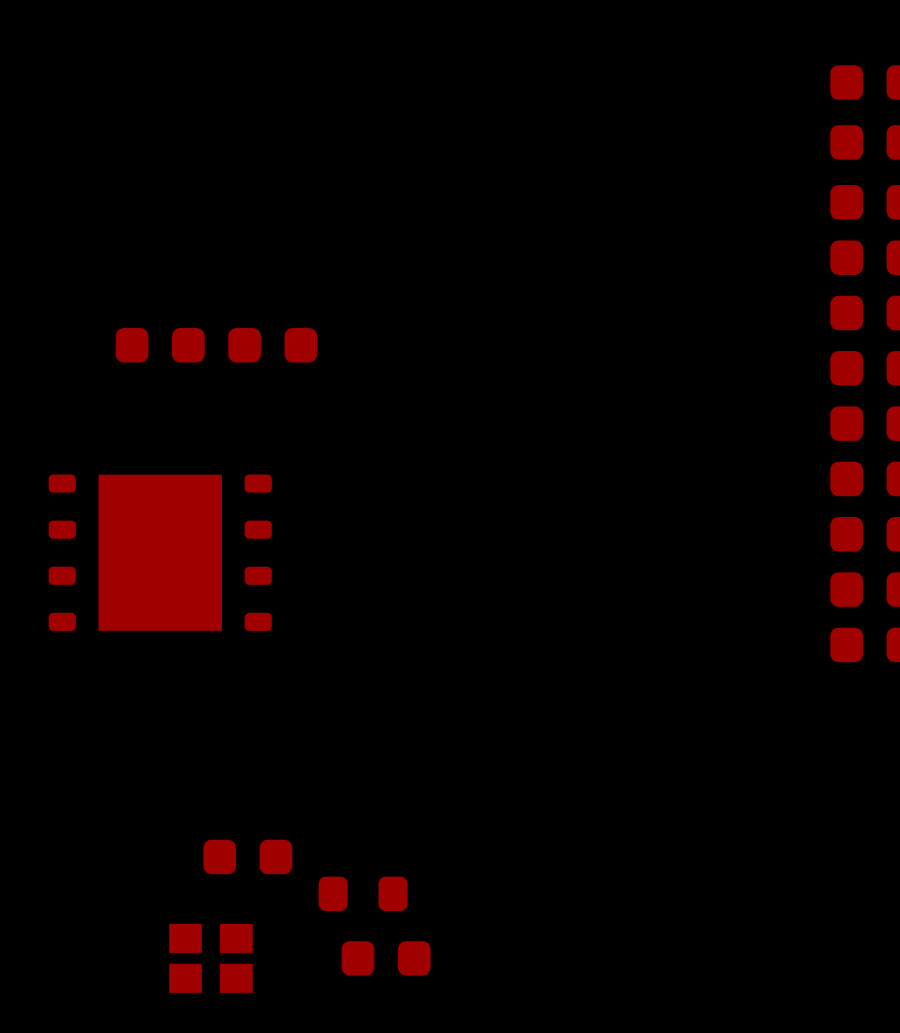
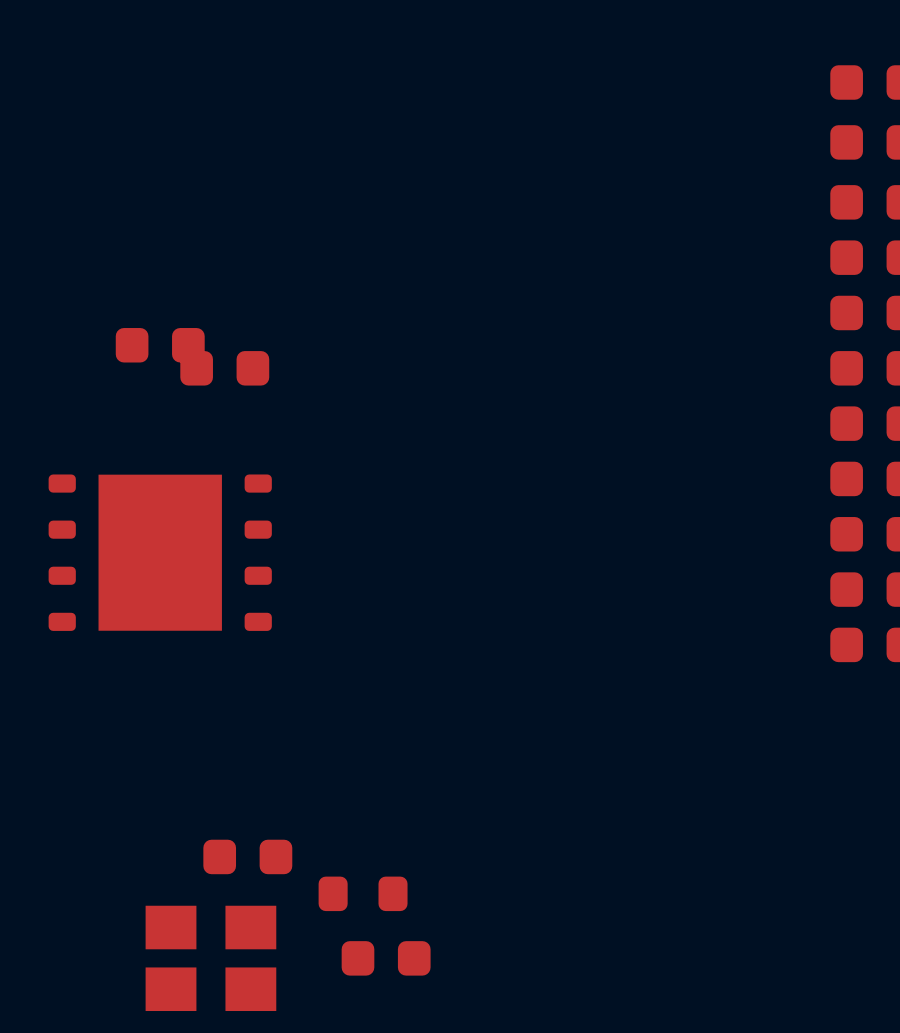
part position: (272, 345) -> (224, 368)
part footprint: [169, 923, 253, 993] -> [145, 905, 277, 1012]

